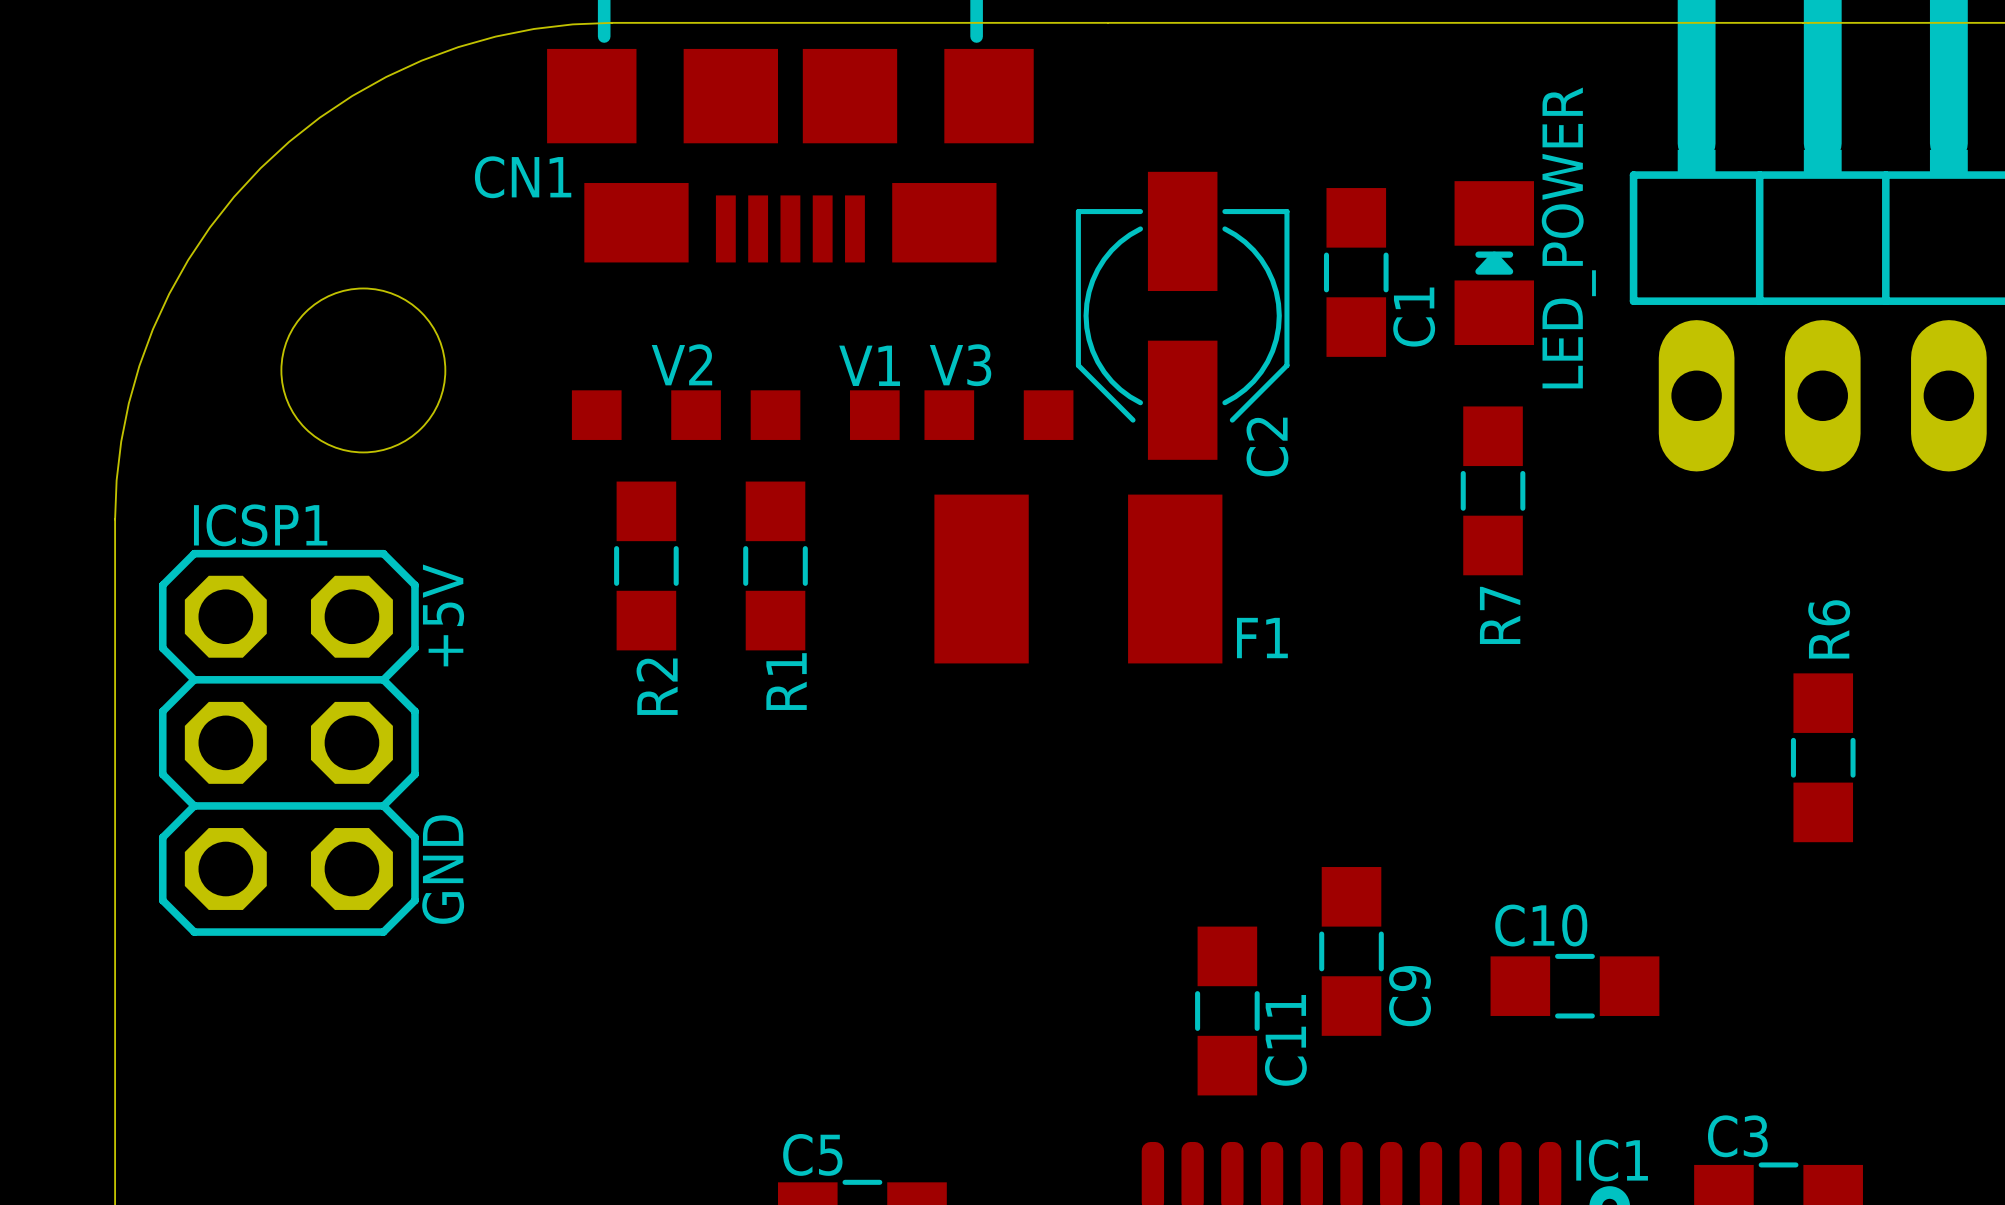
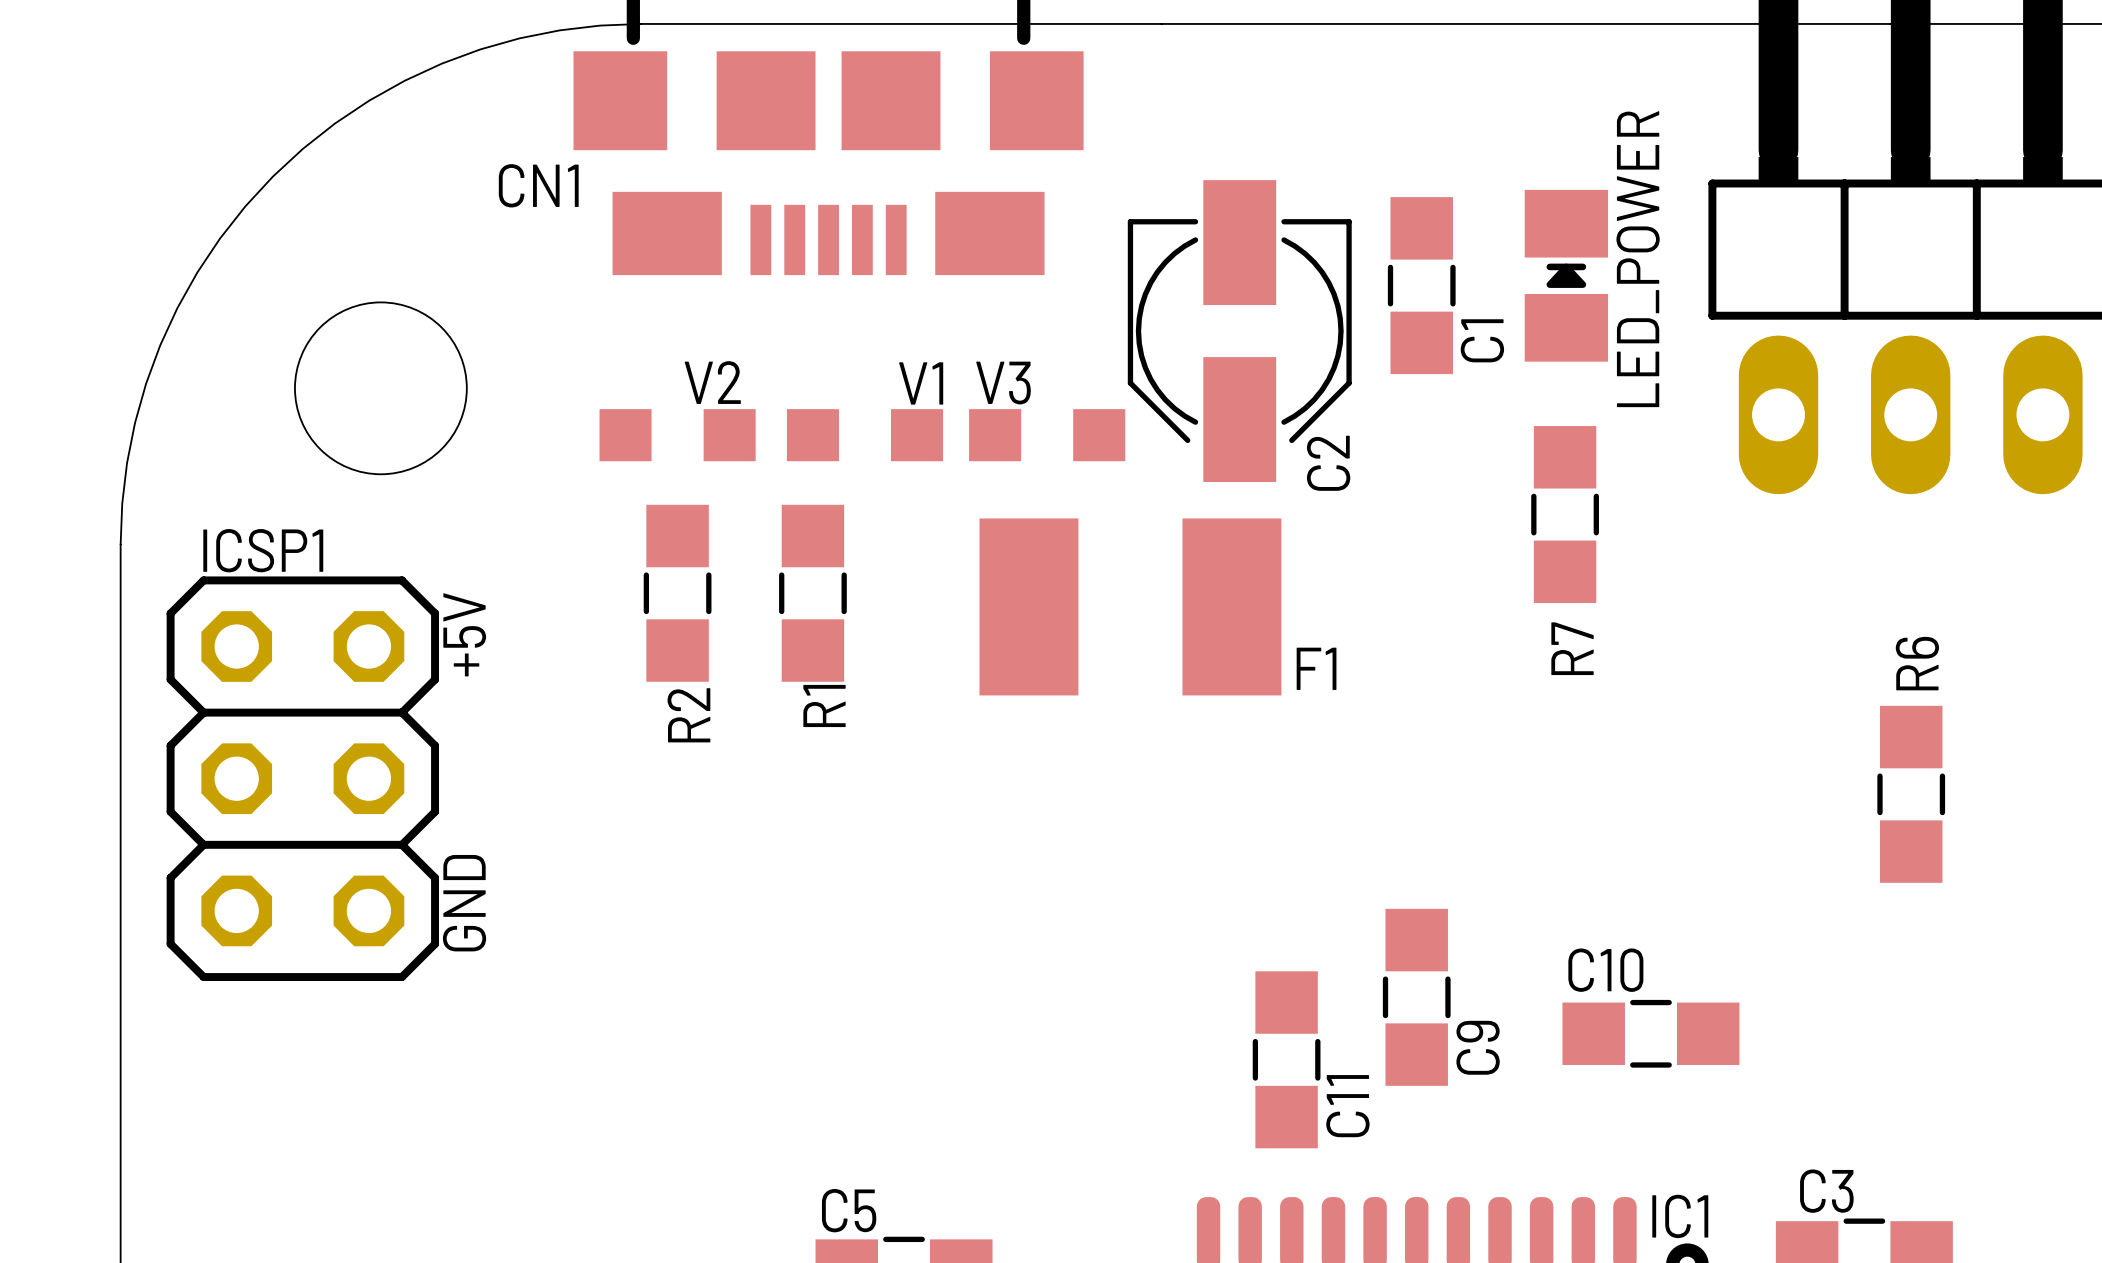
ICSP1 footprint: [158, 549, 419, 936] -> [166, 576, 440, 982]

